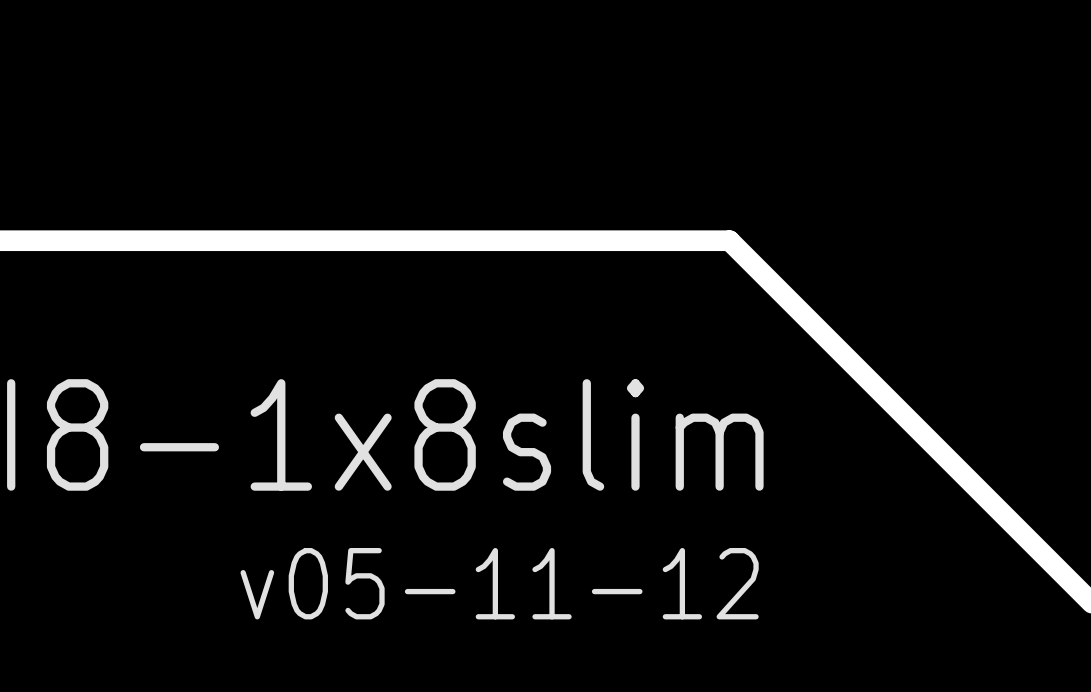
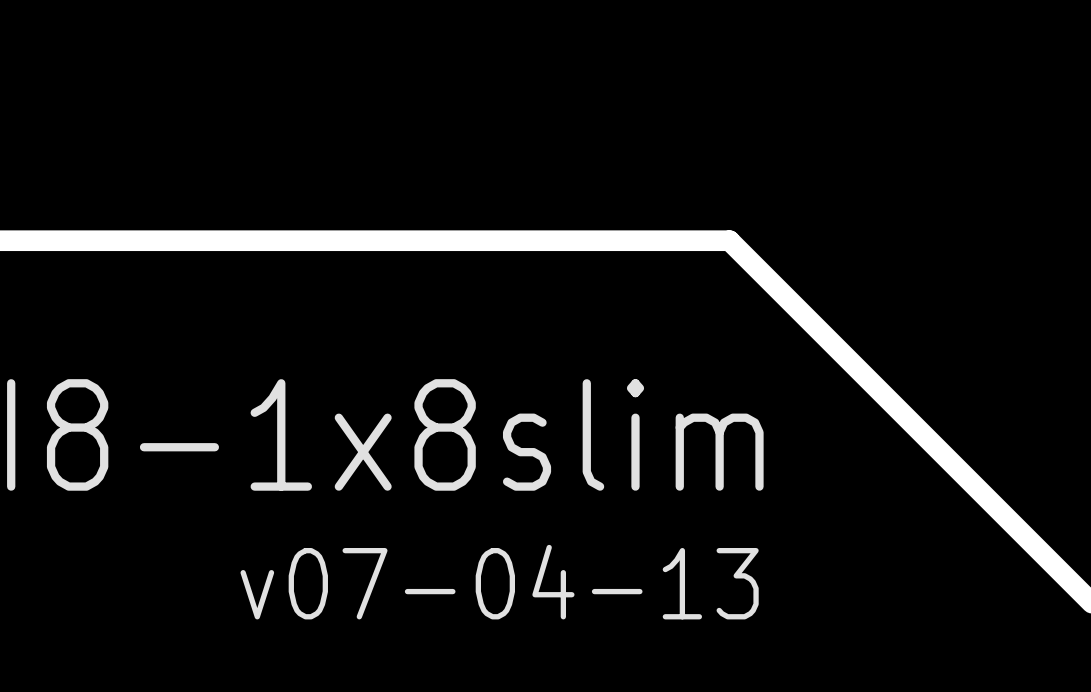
text: v05-11-12 (499, 583) -> v07-04-13 (499, 582)

